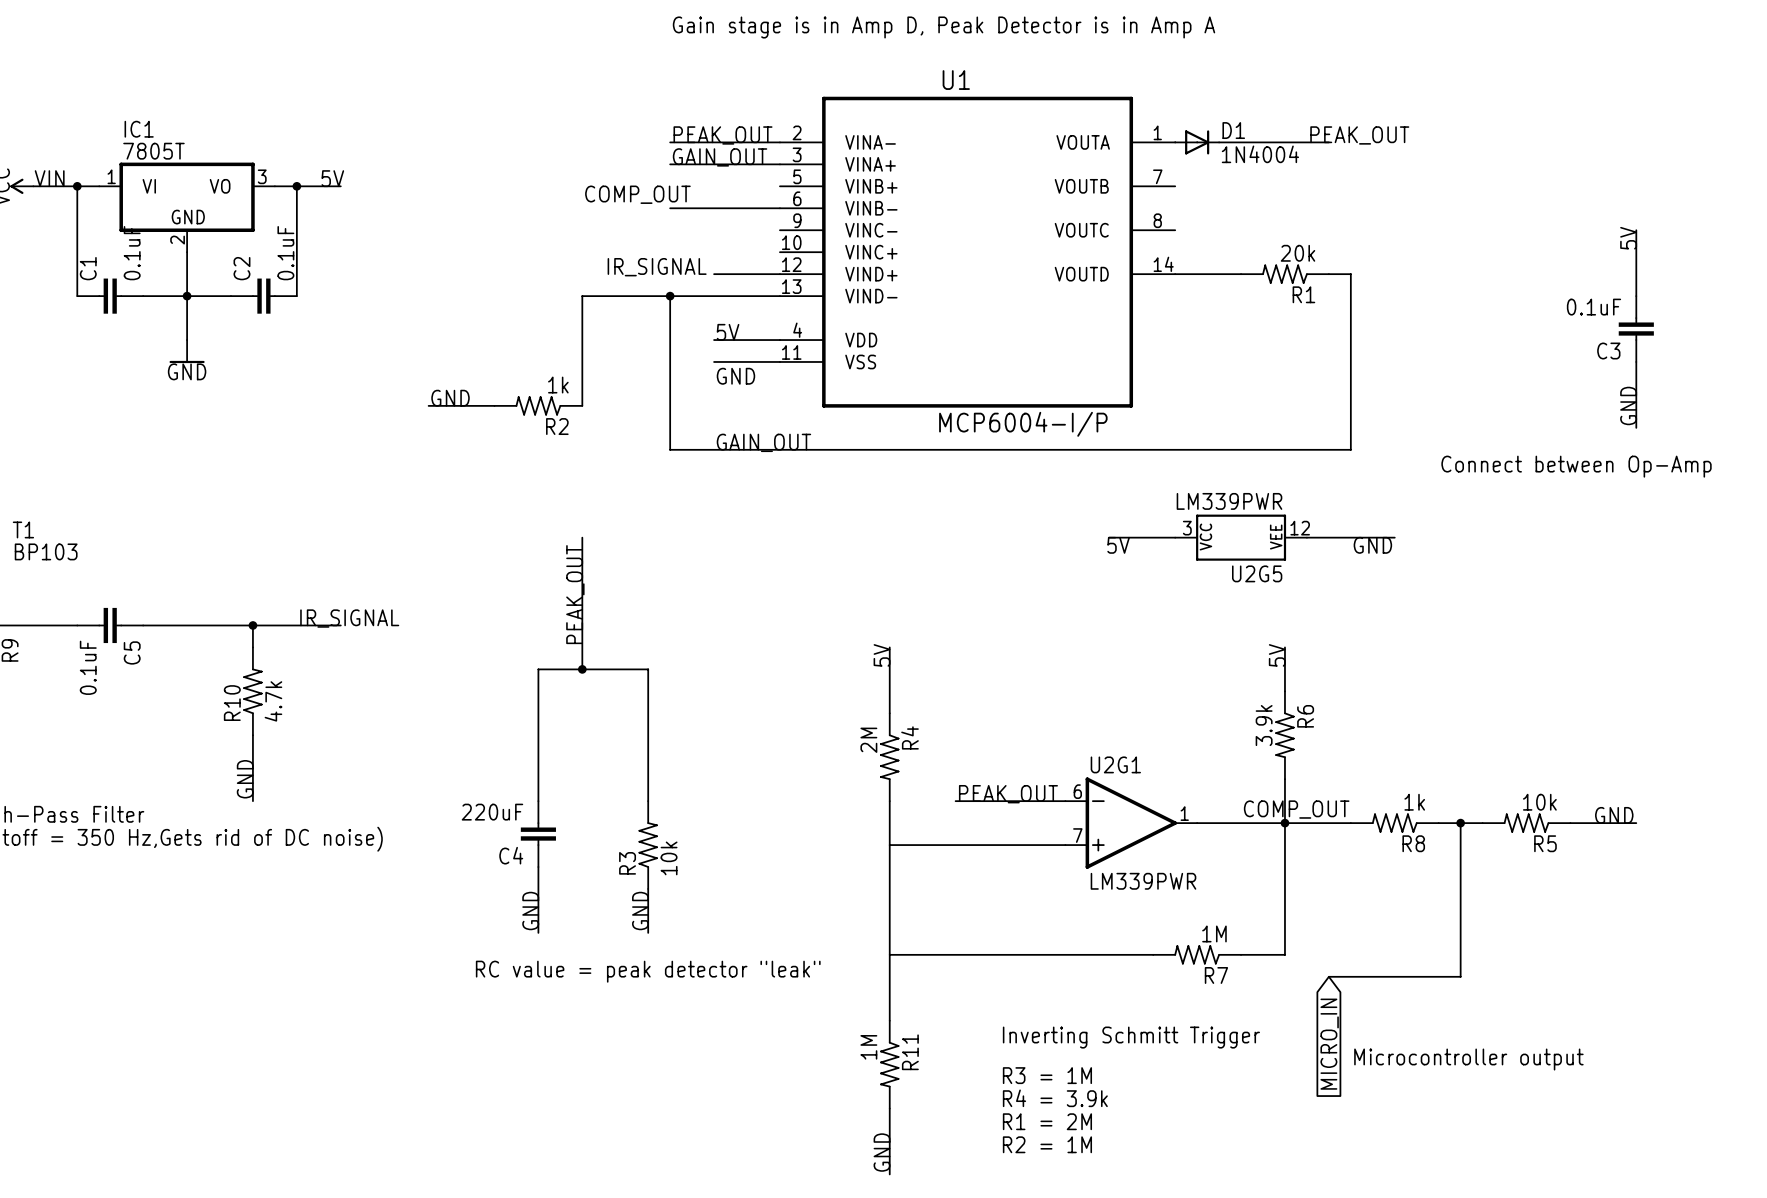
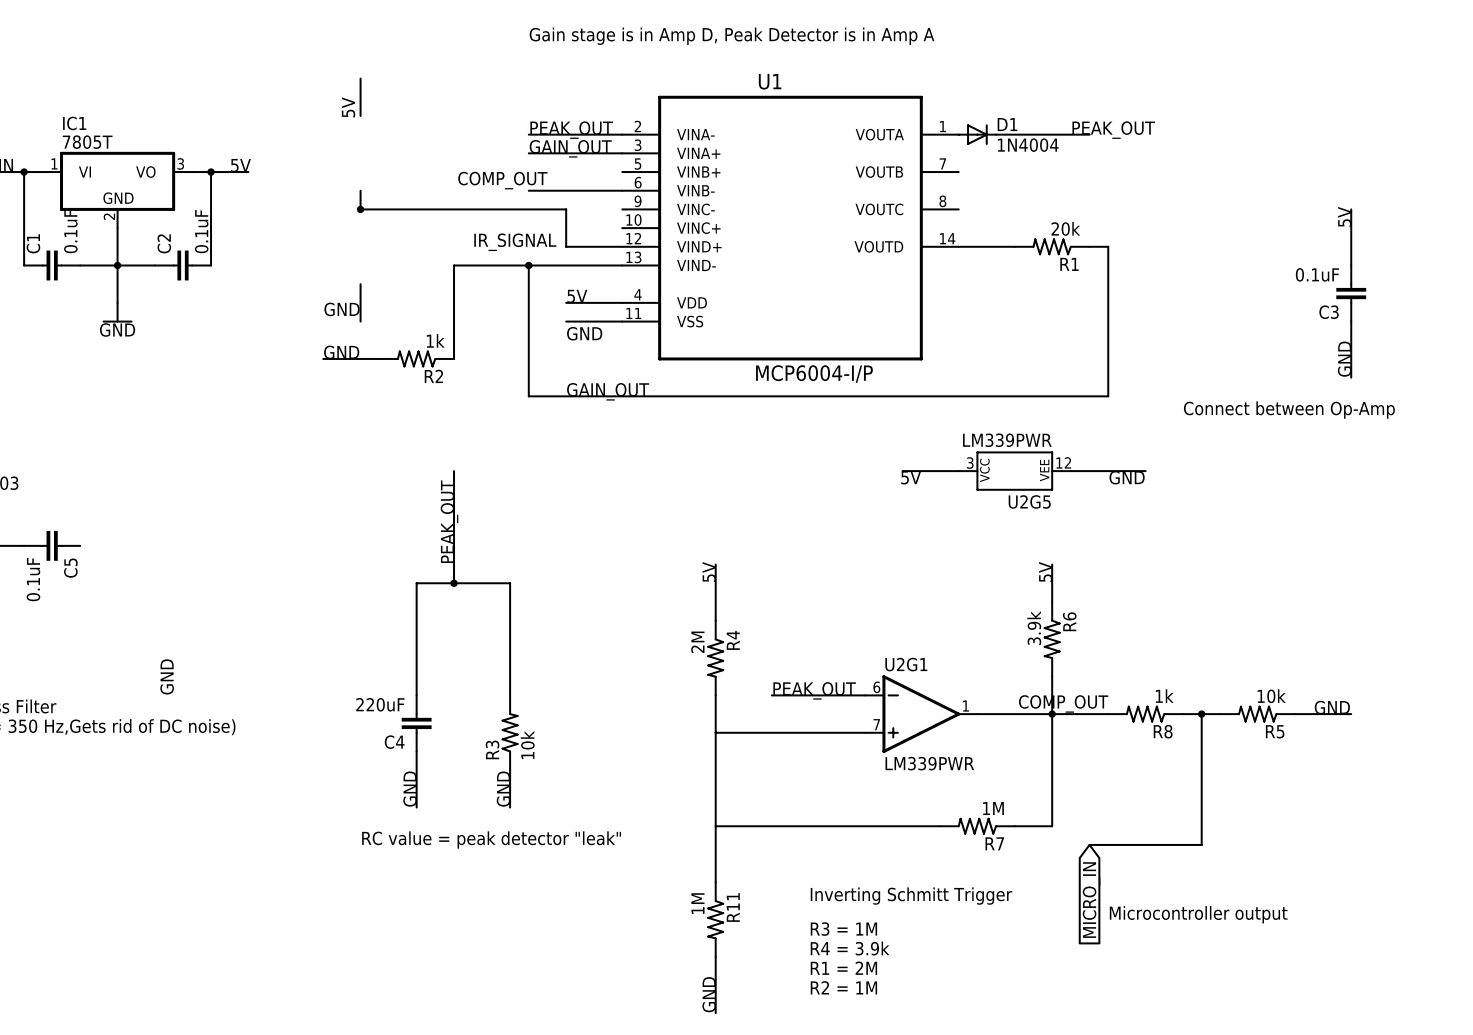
wire: none -> (360, 78) (360, 115)
label: none -> 5V (348, 107)
wire: none -> (360, 190) (360, 209) (566, 209) (566, 246)
junction: none -> (360, 209)
wire: none -> (360, 284) (360, 321)
label: none -> GND (342, 309)
label: IR_SIGNAL (349, 618) -> none
wire: (143, 625) (340, 625) -> none
wire: (252, 625) (252, 647) -> none
junction: (252, 625) -> none
R10: 4.7k (252, 691) -> none
wire: (252, 735) (252, 801) -> none

